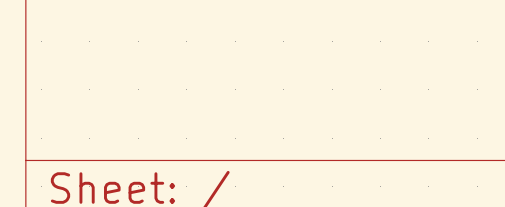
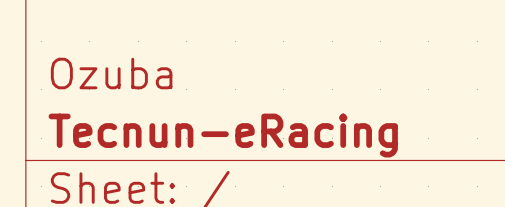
title block: none -> Ozuba (111, 73)
title block: none -> Tecnun-eRacing (223, 135)

